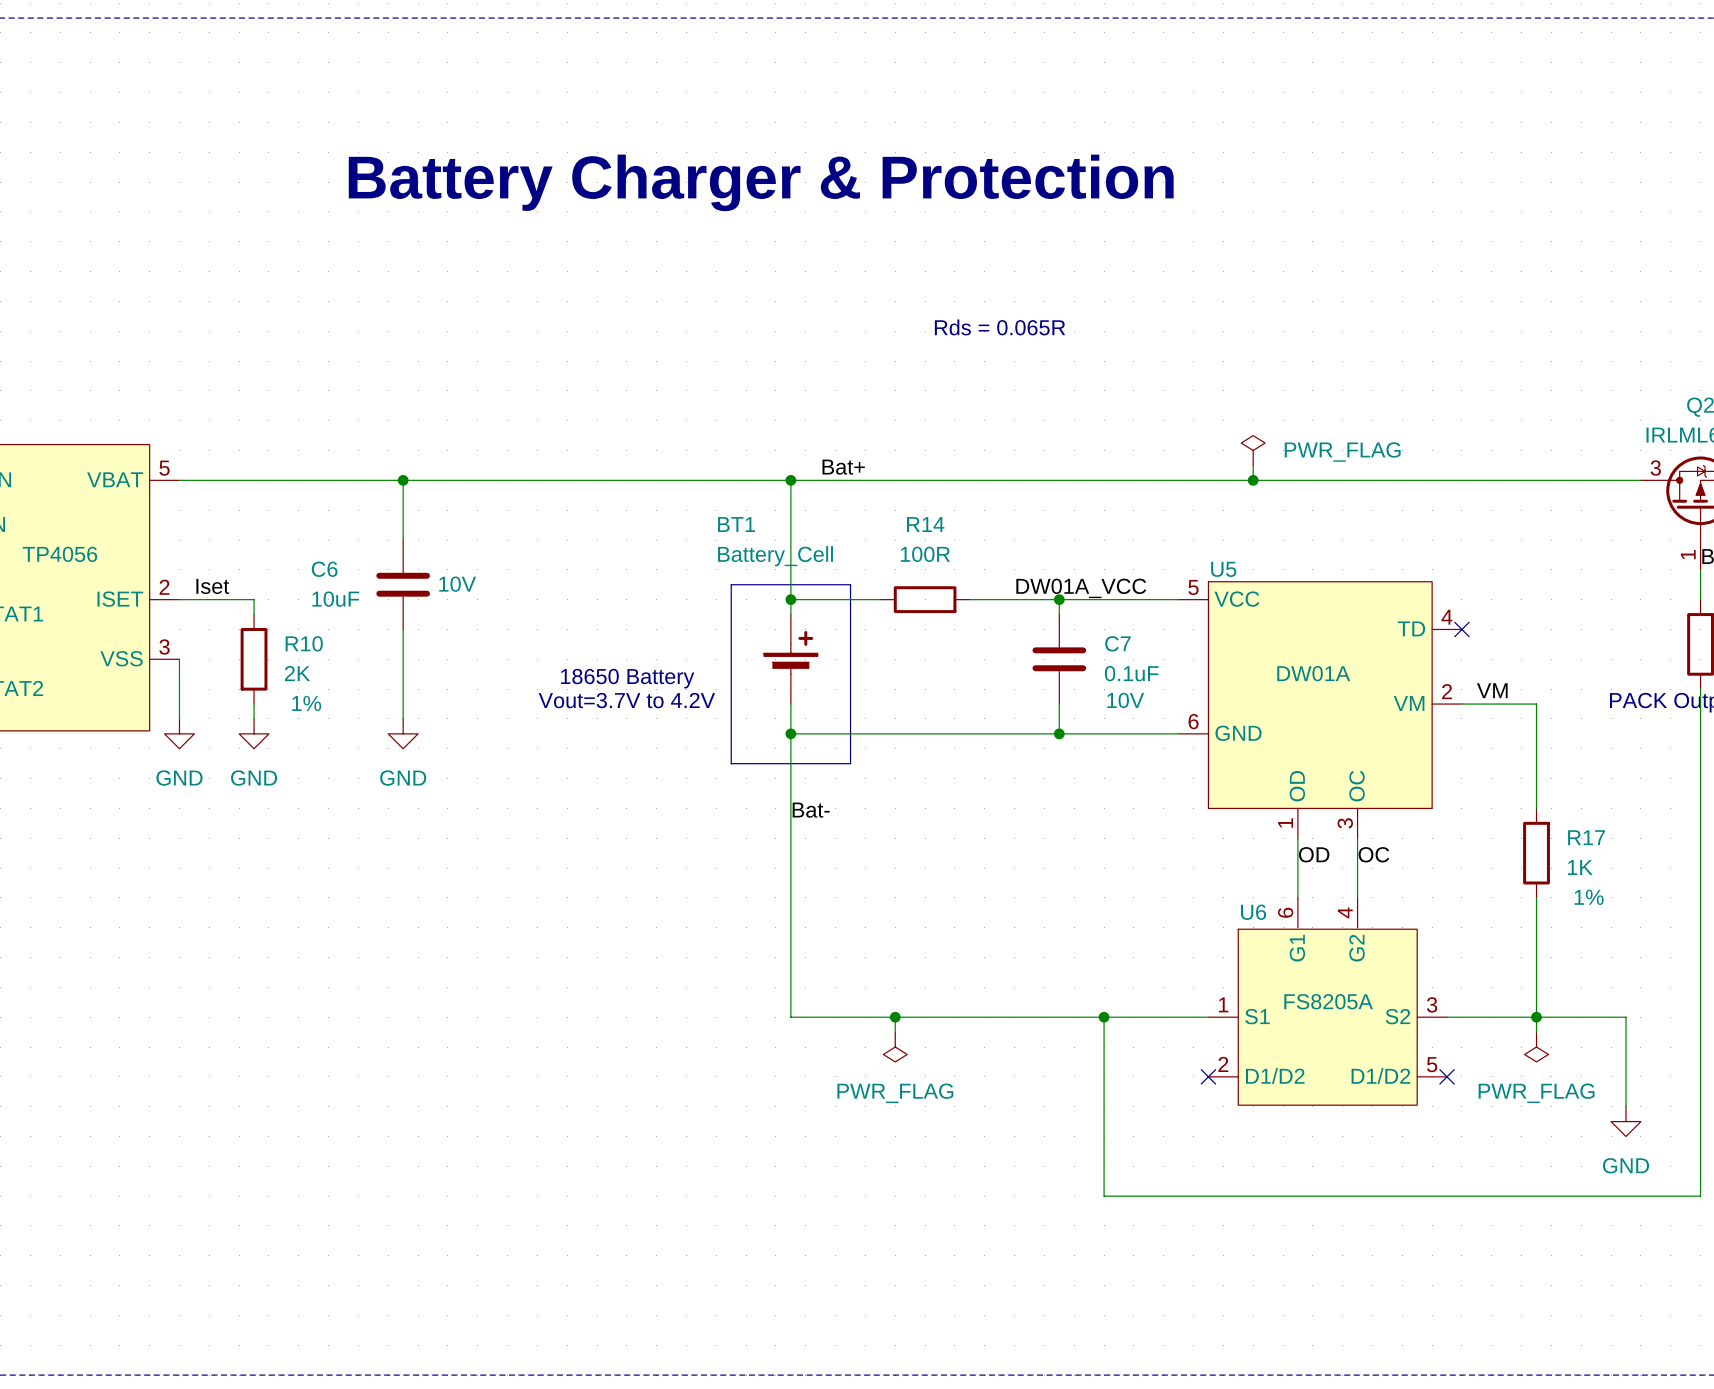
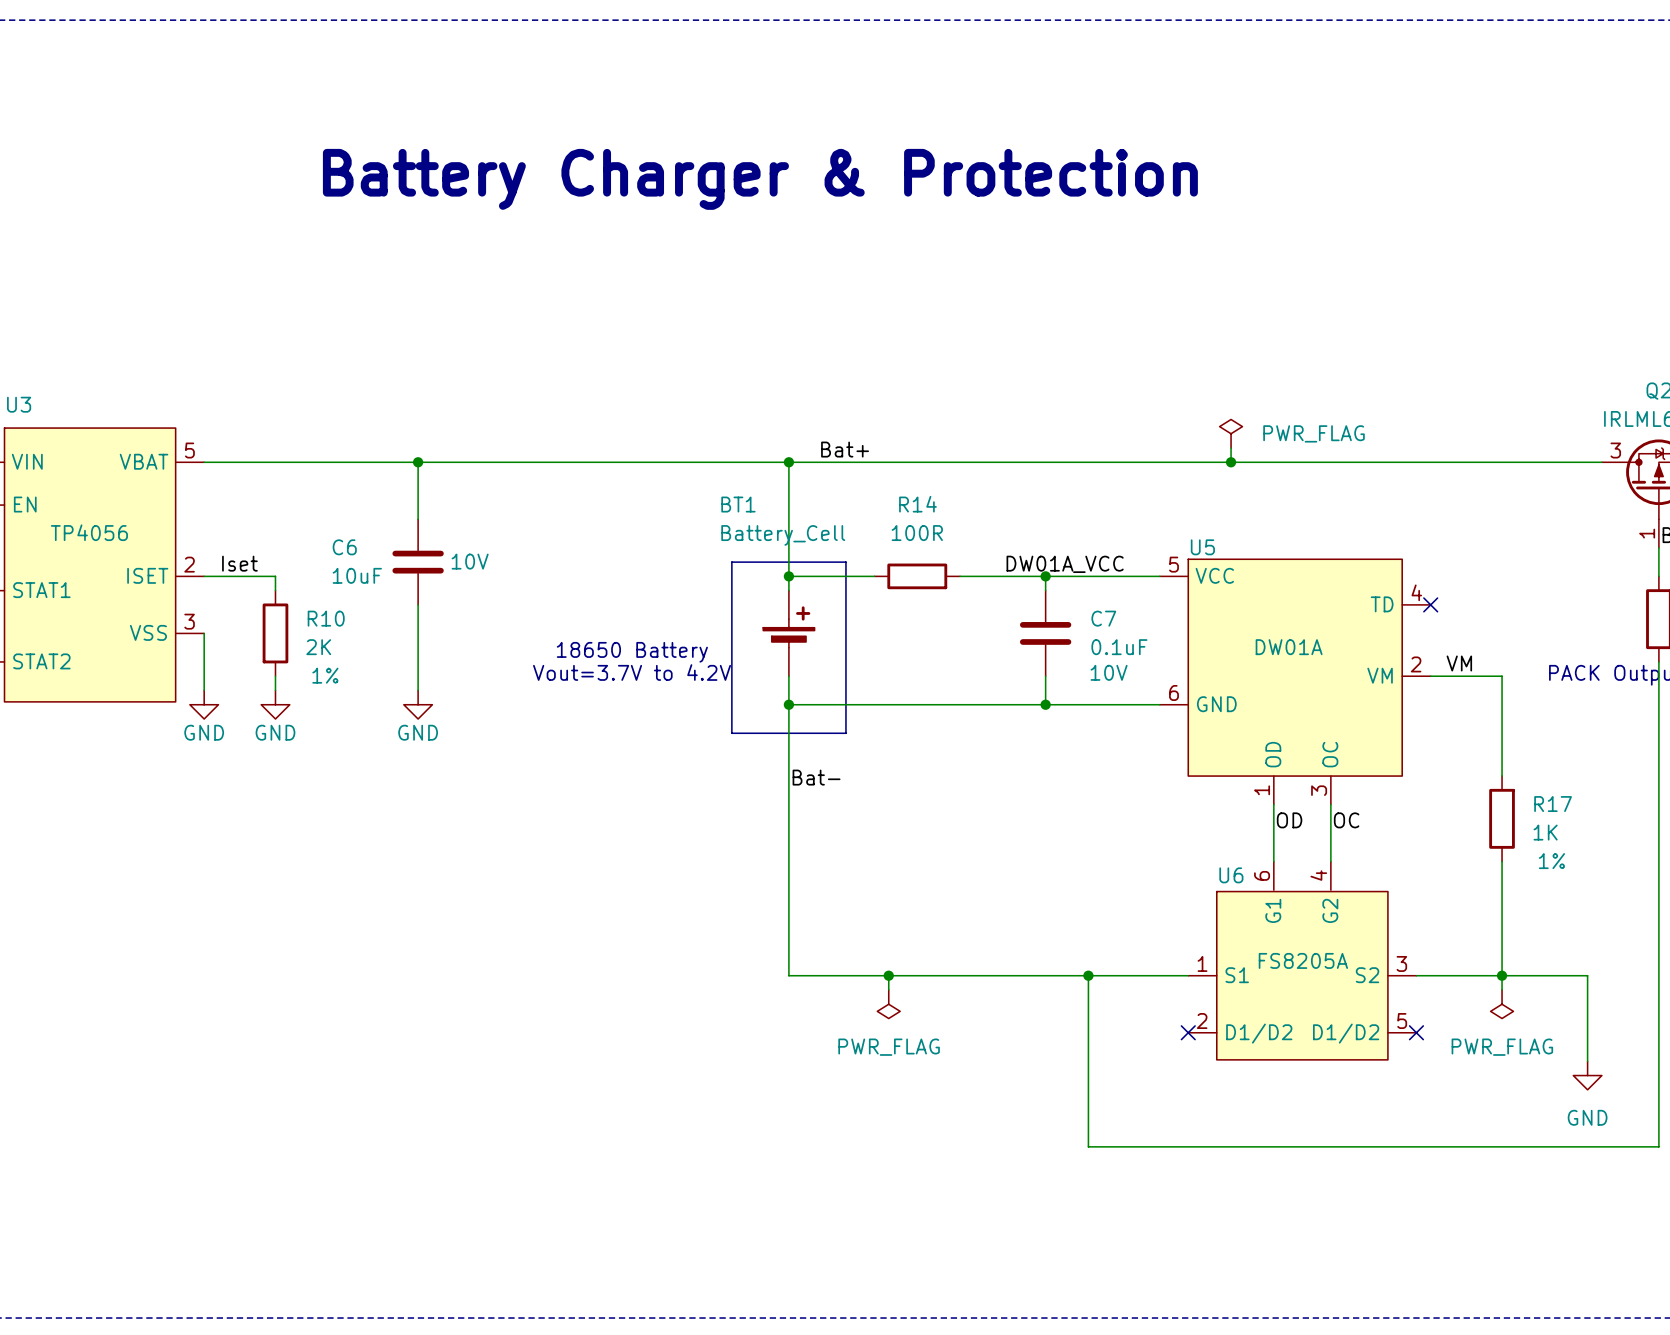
text: Rds = 0.065R (1000, 327) -> none
power symbol text position: GND (179, 778) -> GND (204, 732)
power symbol text position: GND (254, 778) -> GND (275, 732)
power symbol text position: GND (403, 778) -> GND (418, 732)

